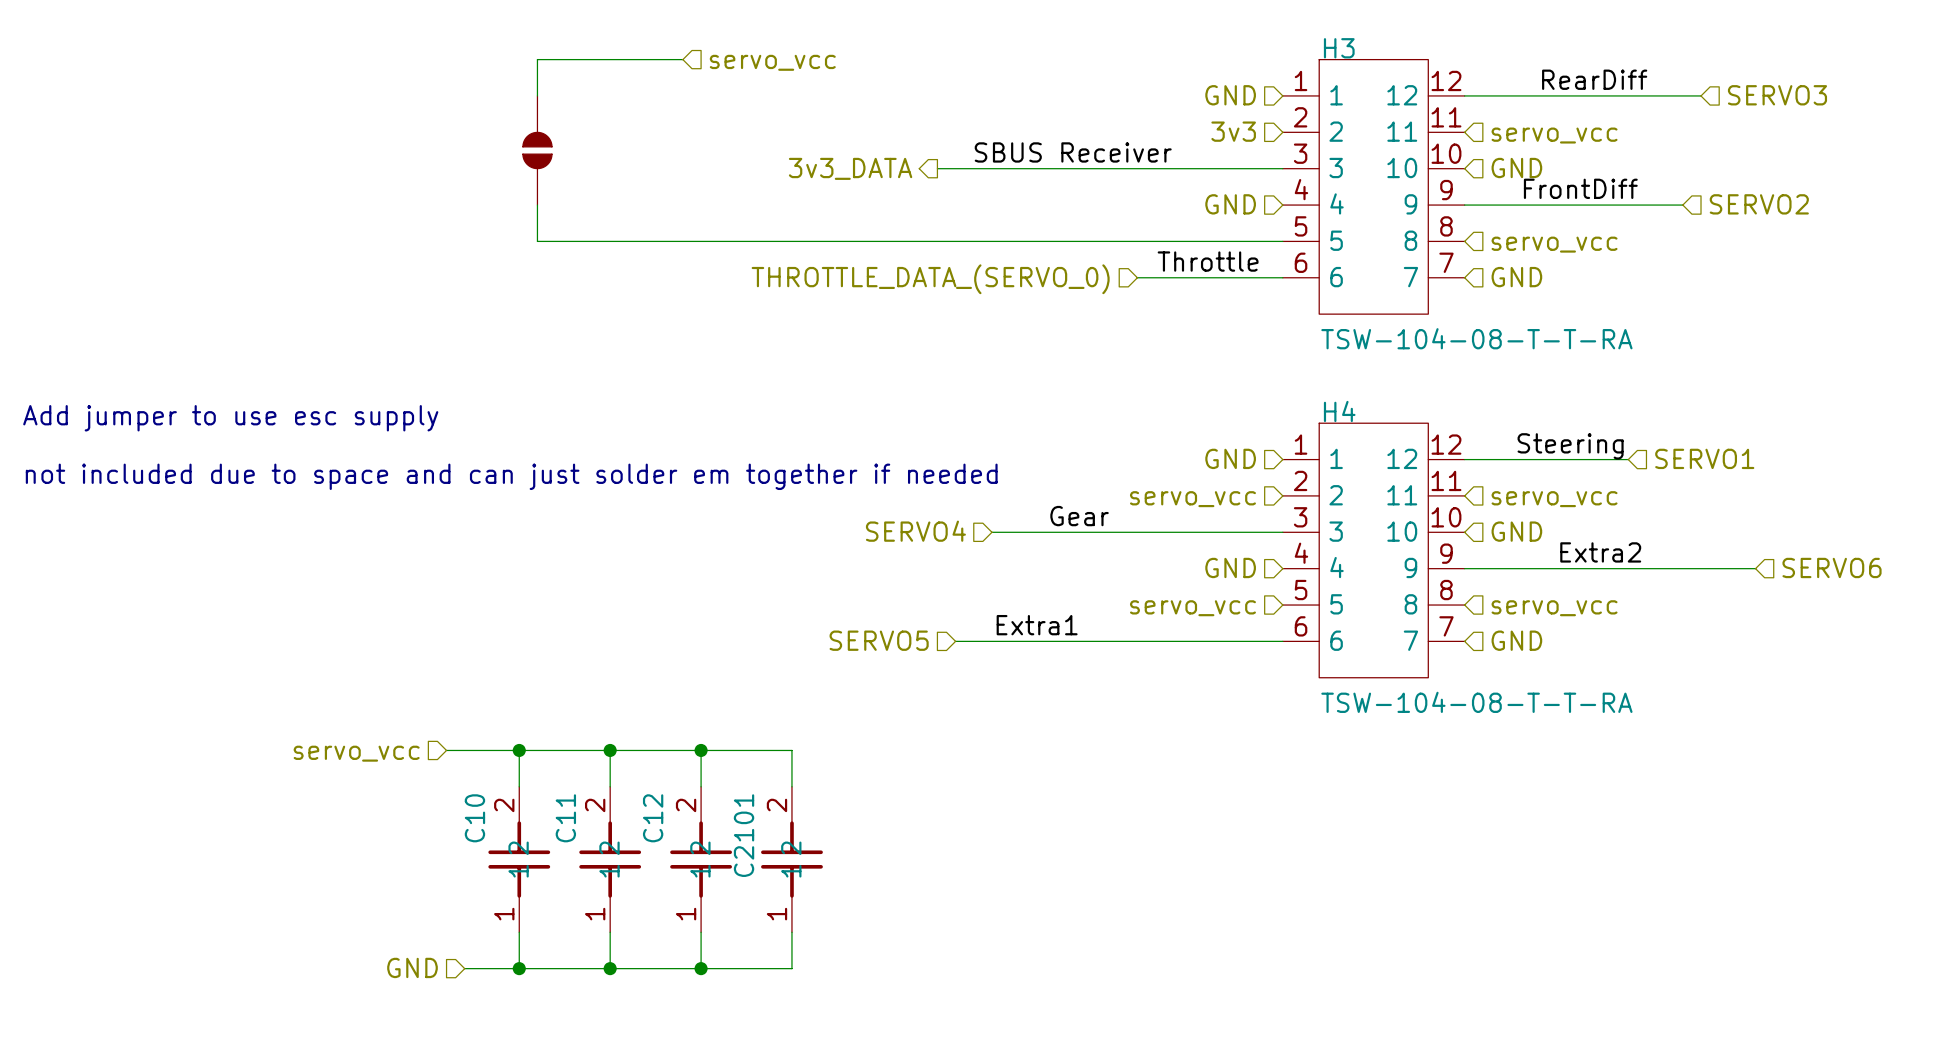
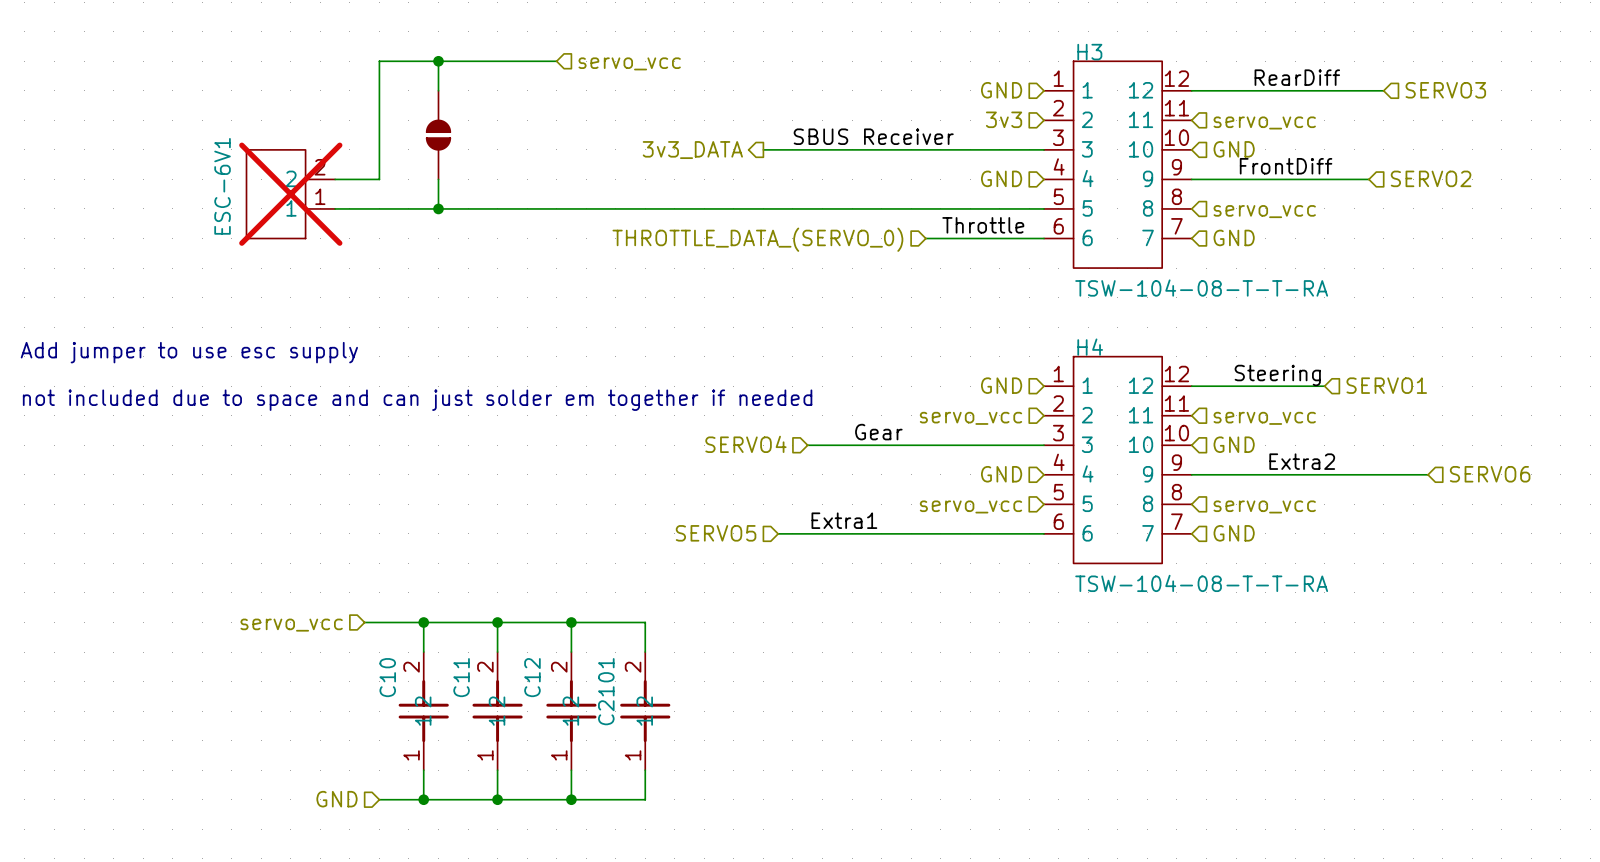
wire: none -> (438, 61) (379, 61) (379, 179) (335, 179)
junction: none -> (438, 61)
ESC-6V1: none -> (290, 194)
wire: none -> (335, 208) (438, 208)
junction: none -> (438, 208)

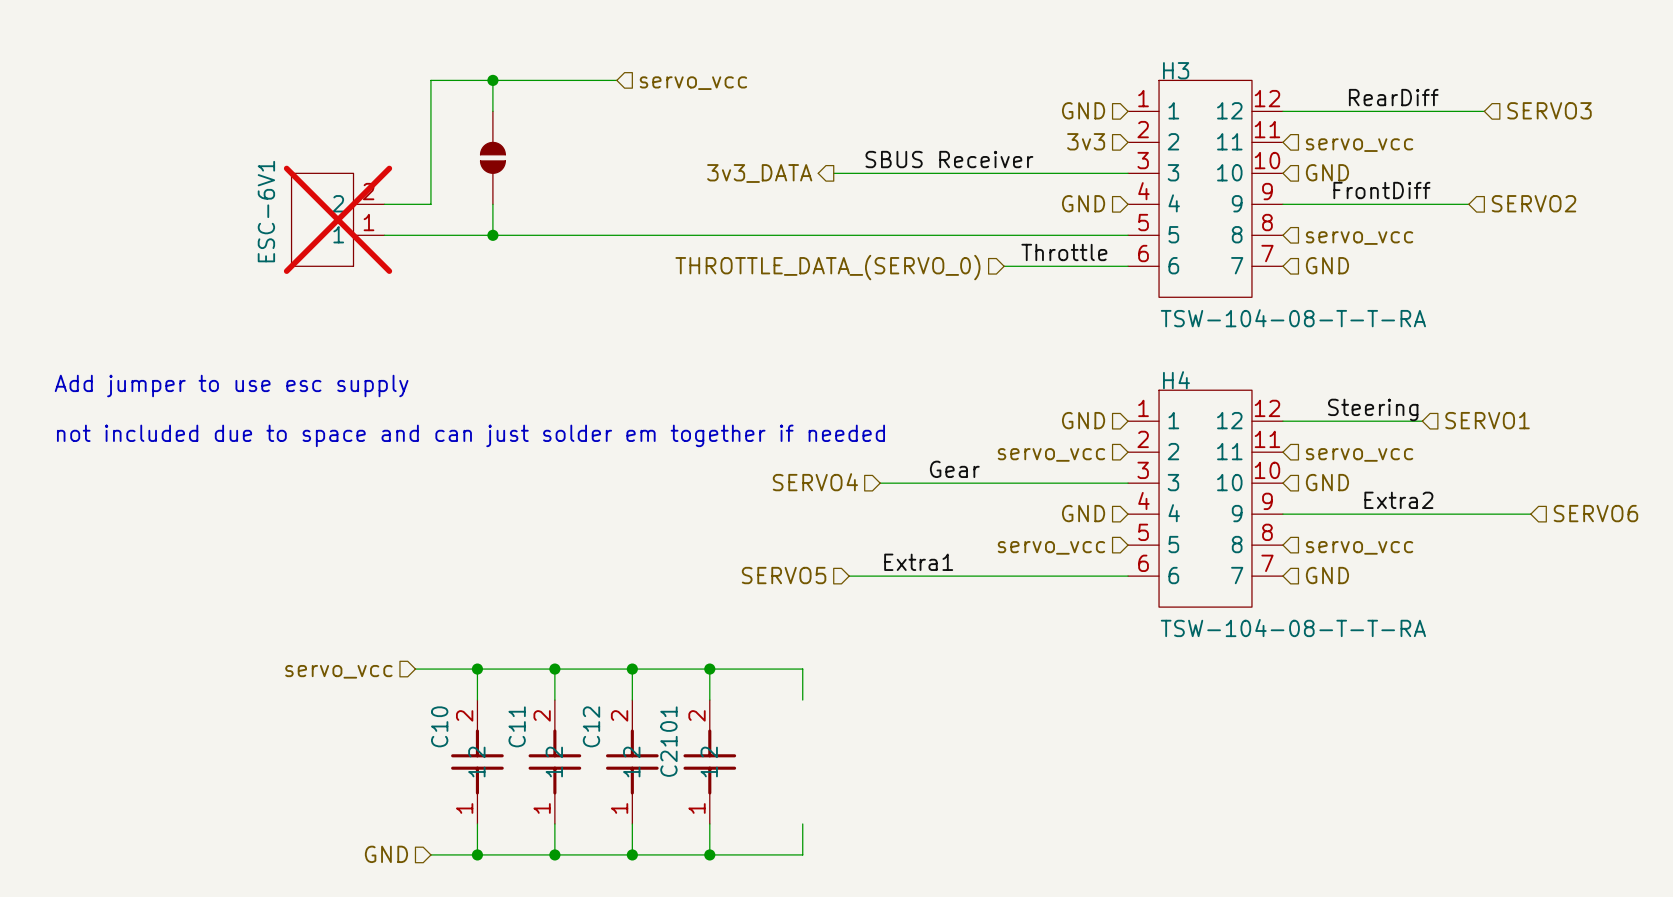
wire: none -> (709, 669) (802, 669) (802, 700)
junction: none -> (709, 669)
wire: none -> (802, 823) (802, 854) (709, 854)
junction: none -> (709, 854)

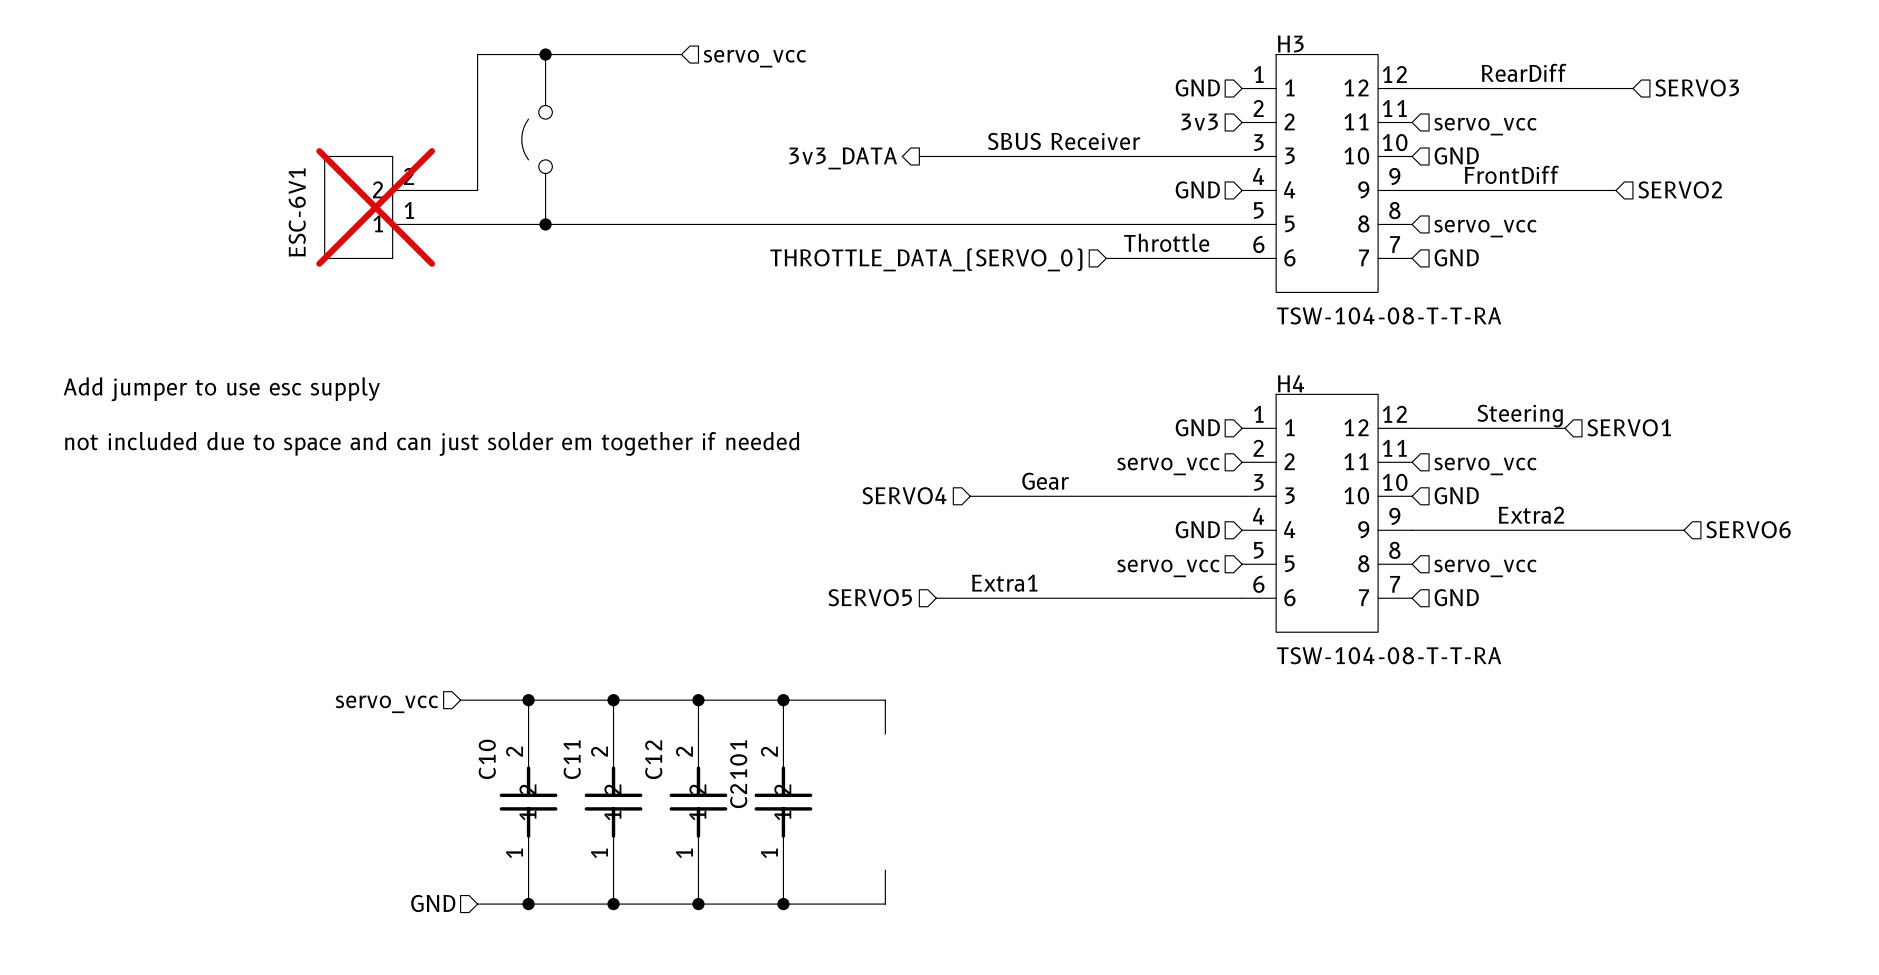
part symbol: [480, 111, 506, 205] -> [521, 71, 553, 208]

